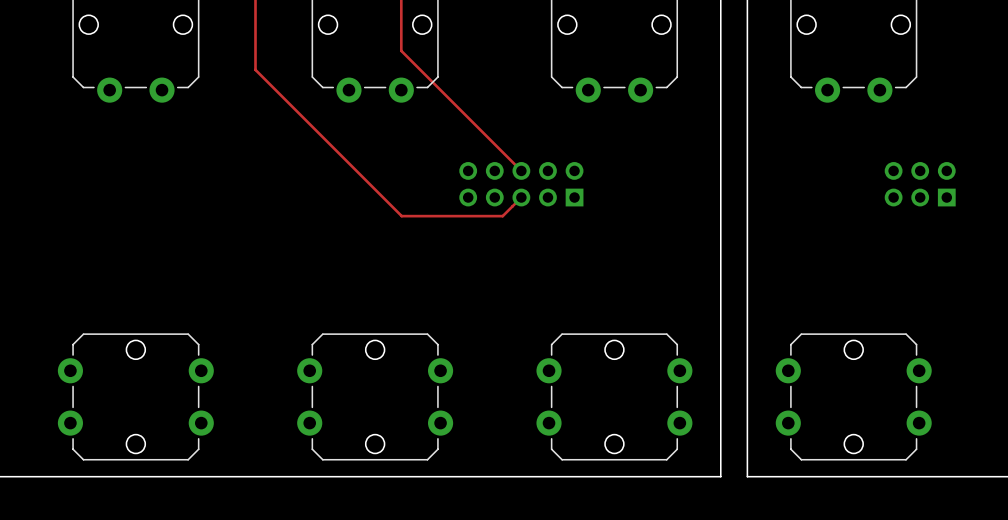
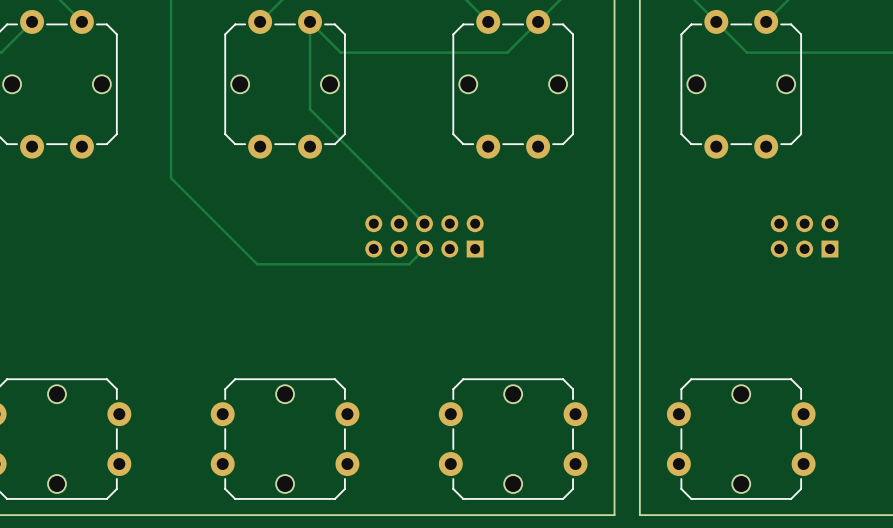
track: (255, 69) (401, 216) (502, 216) (505, 213) -> (171, 127) (171, 178) (257, 264) (409, 264)

